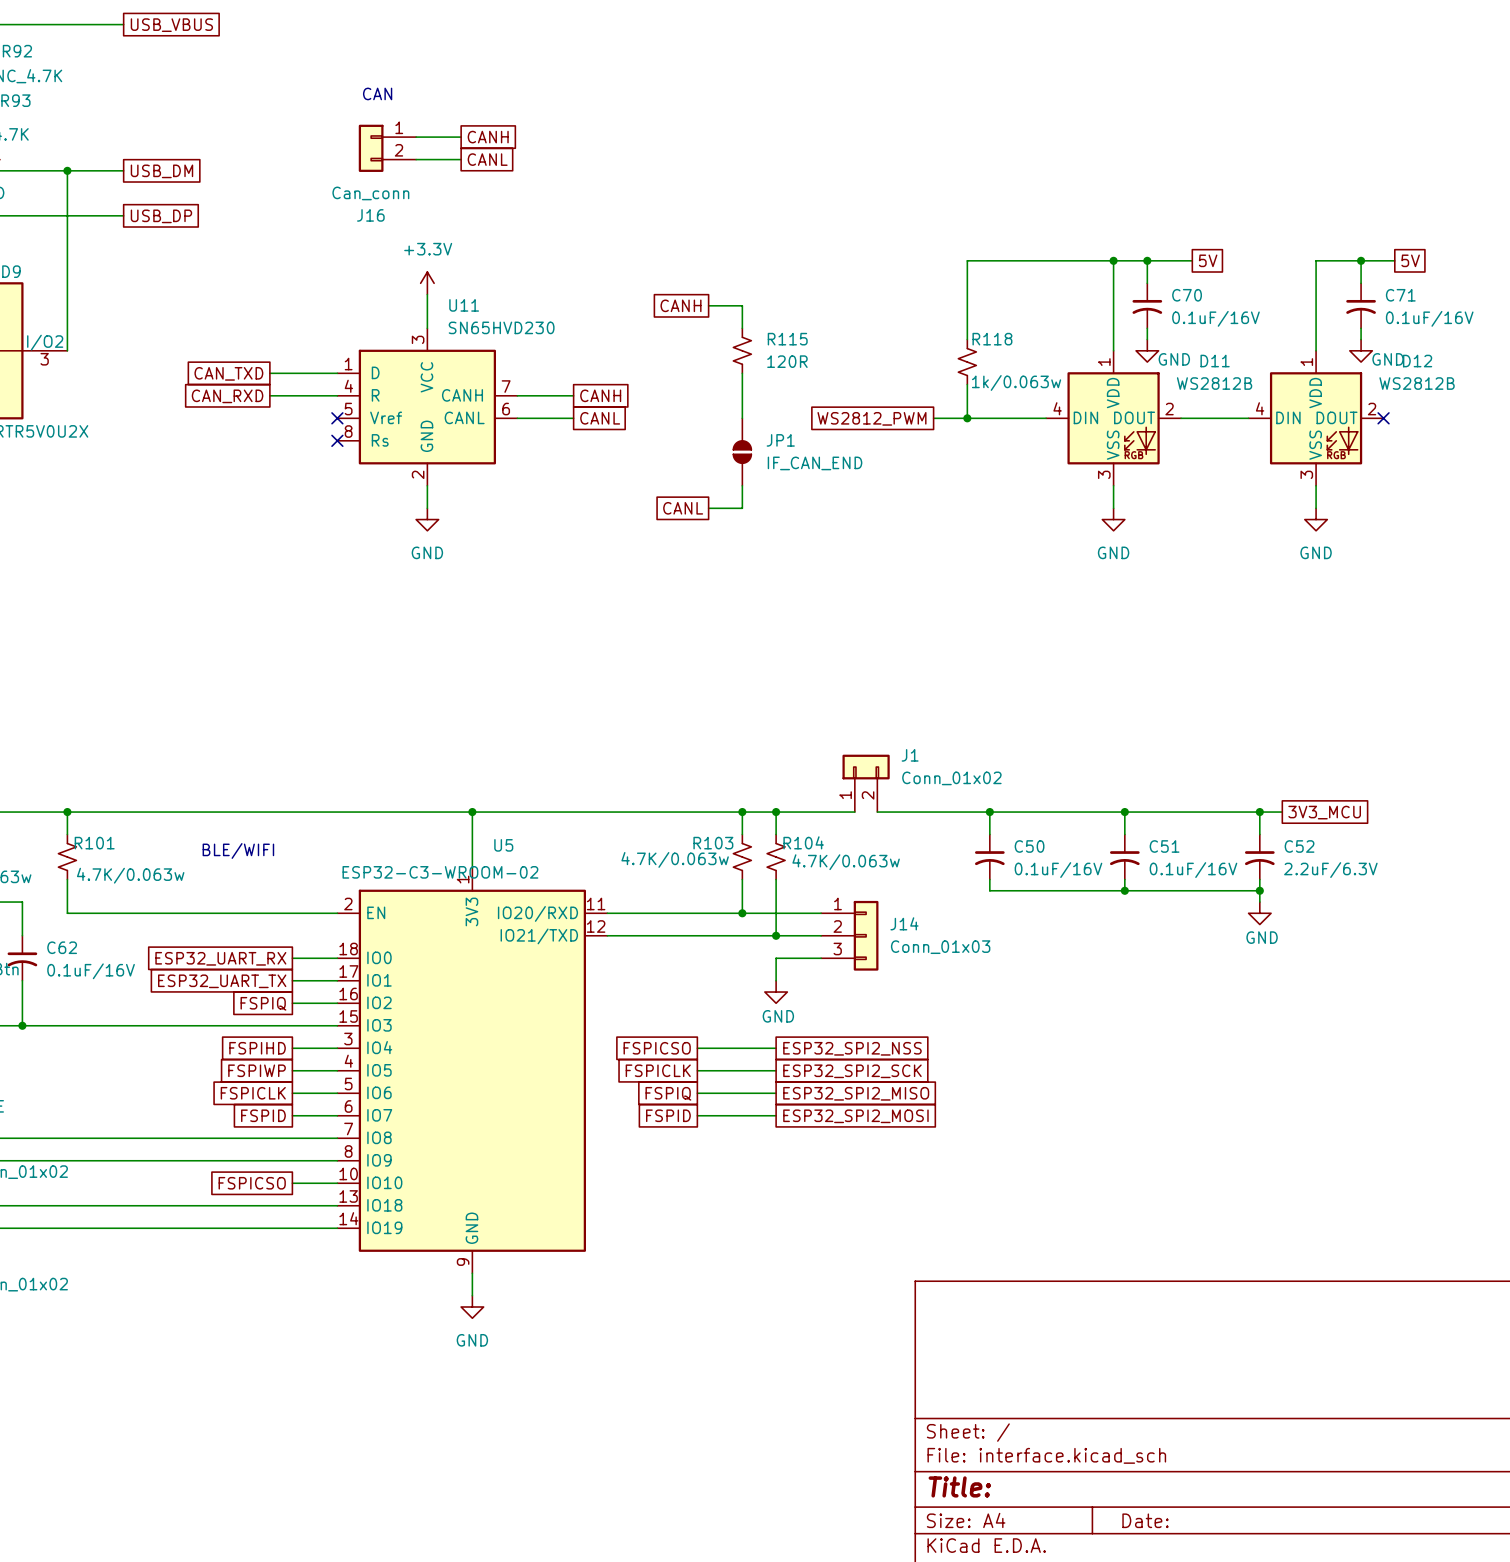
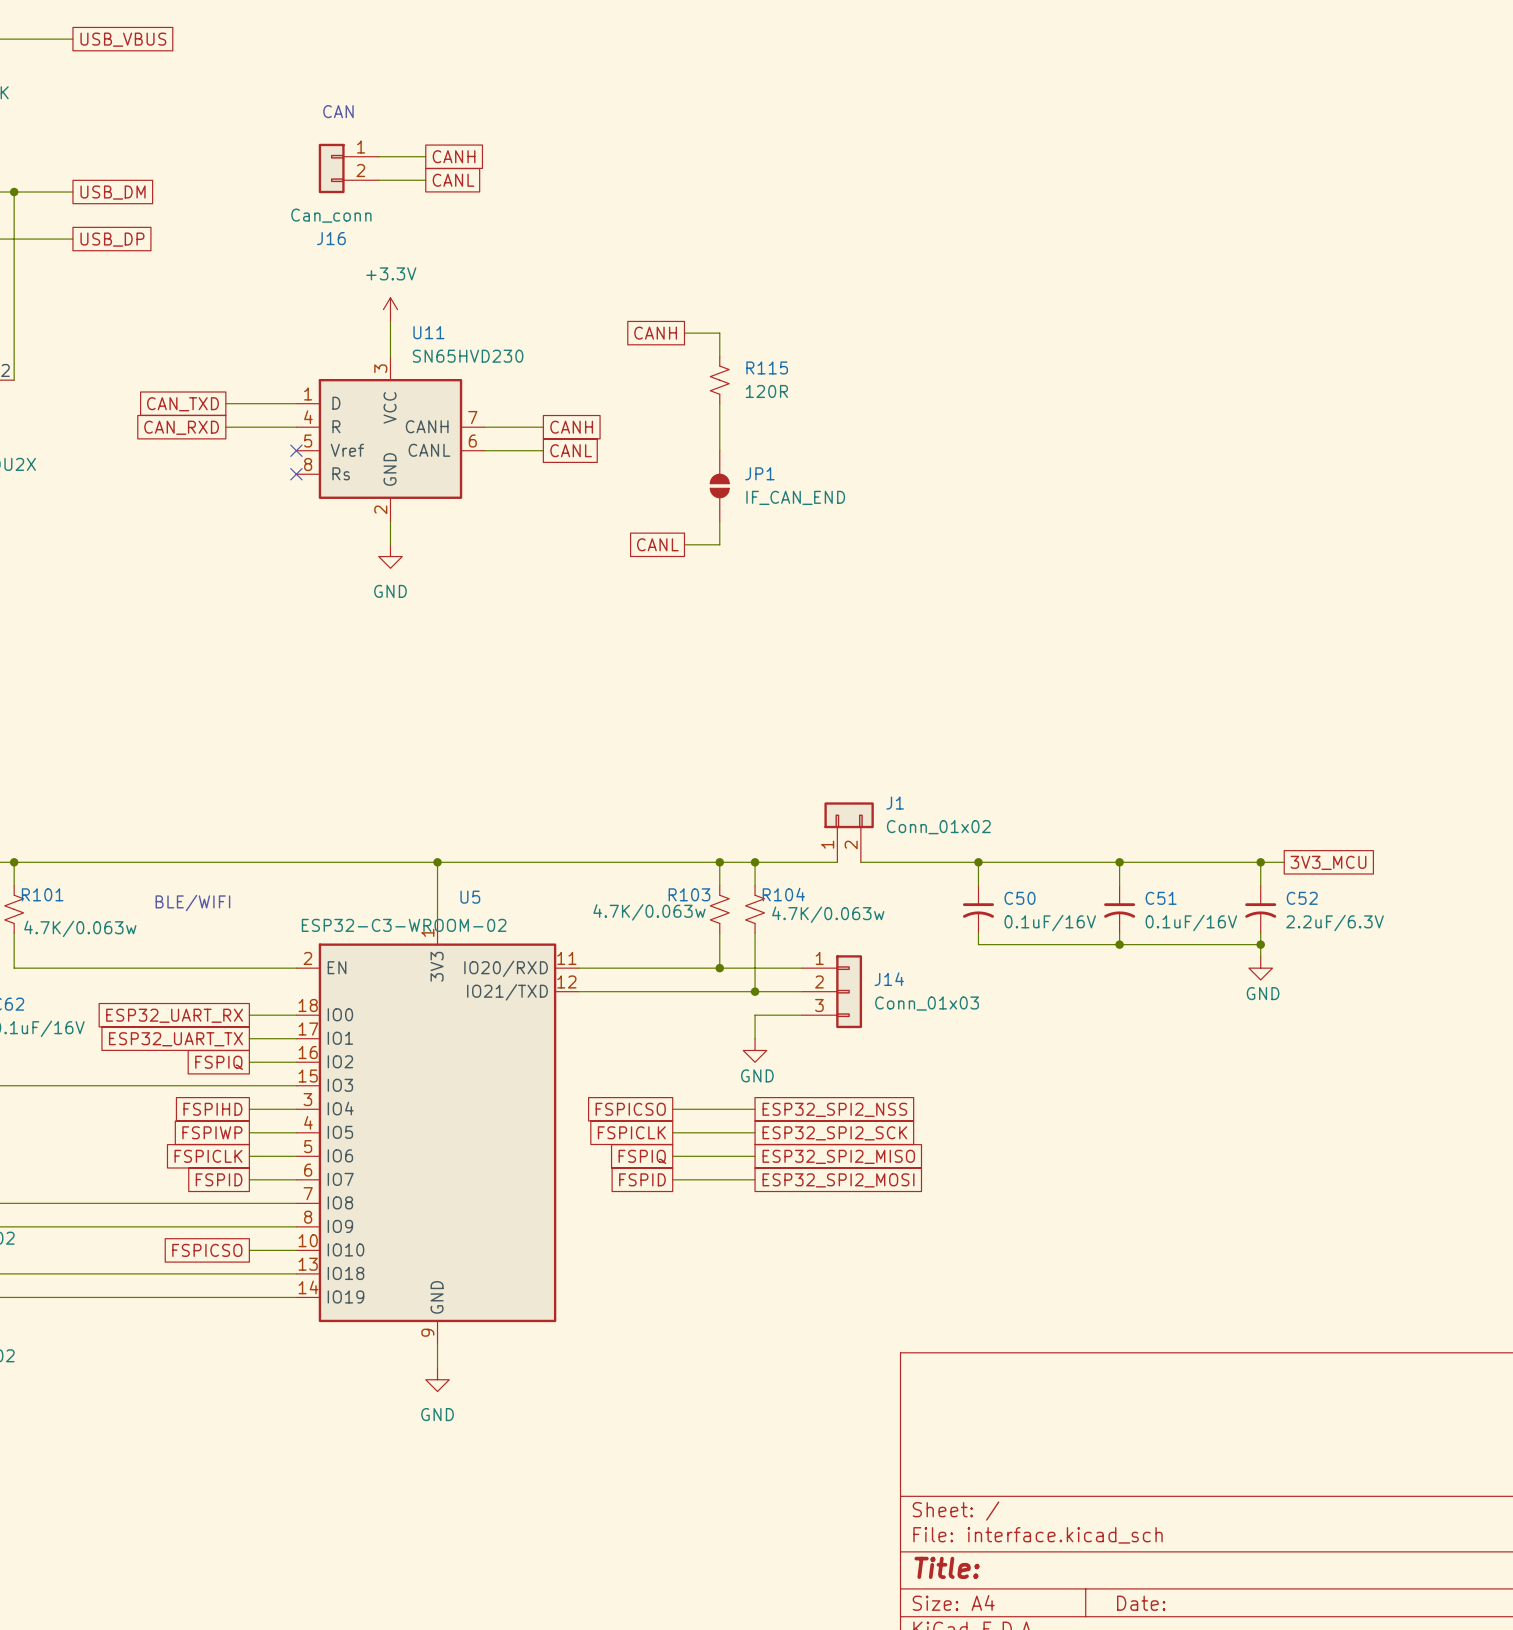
wire: (1113, 260) (1113, 350) -> none
junction: (1113, 260) -> none
wire: (1147, 260) (1147, 283) -> none
junction: (1147, 260) -> none
wire: (1192, 260) (967, 260) (967, 339) -> none
global label: 5V (1208, 260) -> none
wire: (1361, 260) (1361, 283) -> none
junction: (1361, 260) -> none
wire: (1394, 260) (1316, 260) (1316, 350) -> none
global label: 5V (1410, 260) -> none
C70: 0.1uF/16V (1147, 305) -> none
C71: 0.1uF/16V (1361, 305) -> none
wire: (1147, 328) (1147, 339) -> none
wire: (1361, 328) (1361, 339) -> none
power symbol: GND (1147, 350) -> none
power symbol: GND (1361, 350) -> none
R118: 1k/0.063w (967, 362) -> none
wire: (967, 384) (967, 418) -> none
global label: WS2812_PWM (871, 418) -> none
wire: (933, 418) (1046, 418) -> none
junction: (967, 418) -> none
D11: WS2812B (1113, 418) -> none
wire: (1181, 418) (1248, 418) -> none
D12: WS2812B (1316, 418) -> none
no-connect mark: (1383, 418) -> none
wire: (1113, 485) (1113, 508) -> none
wire: (1316, 485) (1316, 508) -> none
power symbol: GND (1113, 519) -> none
power symbol: GND (1316, 519) -> none

